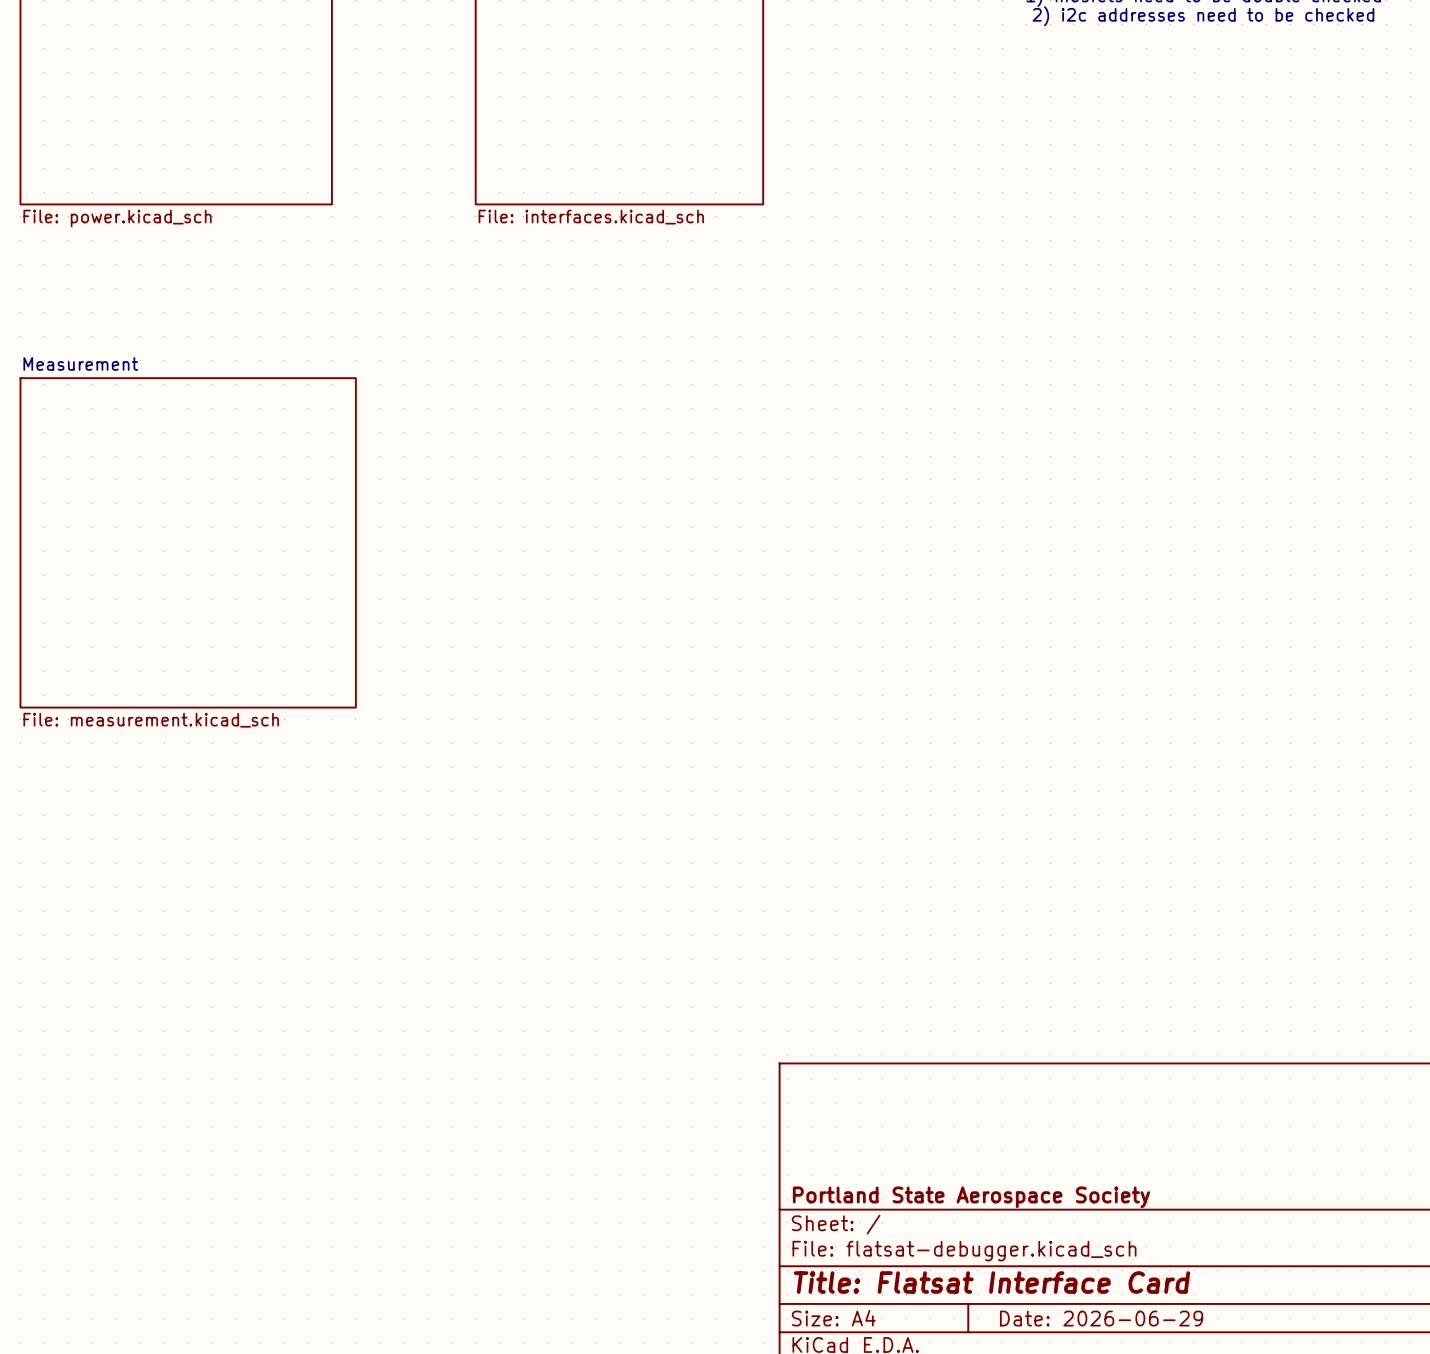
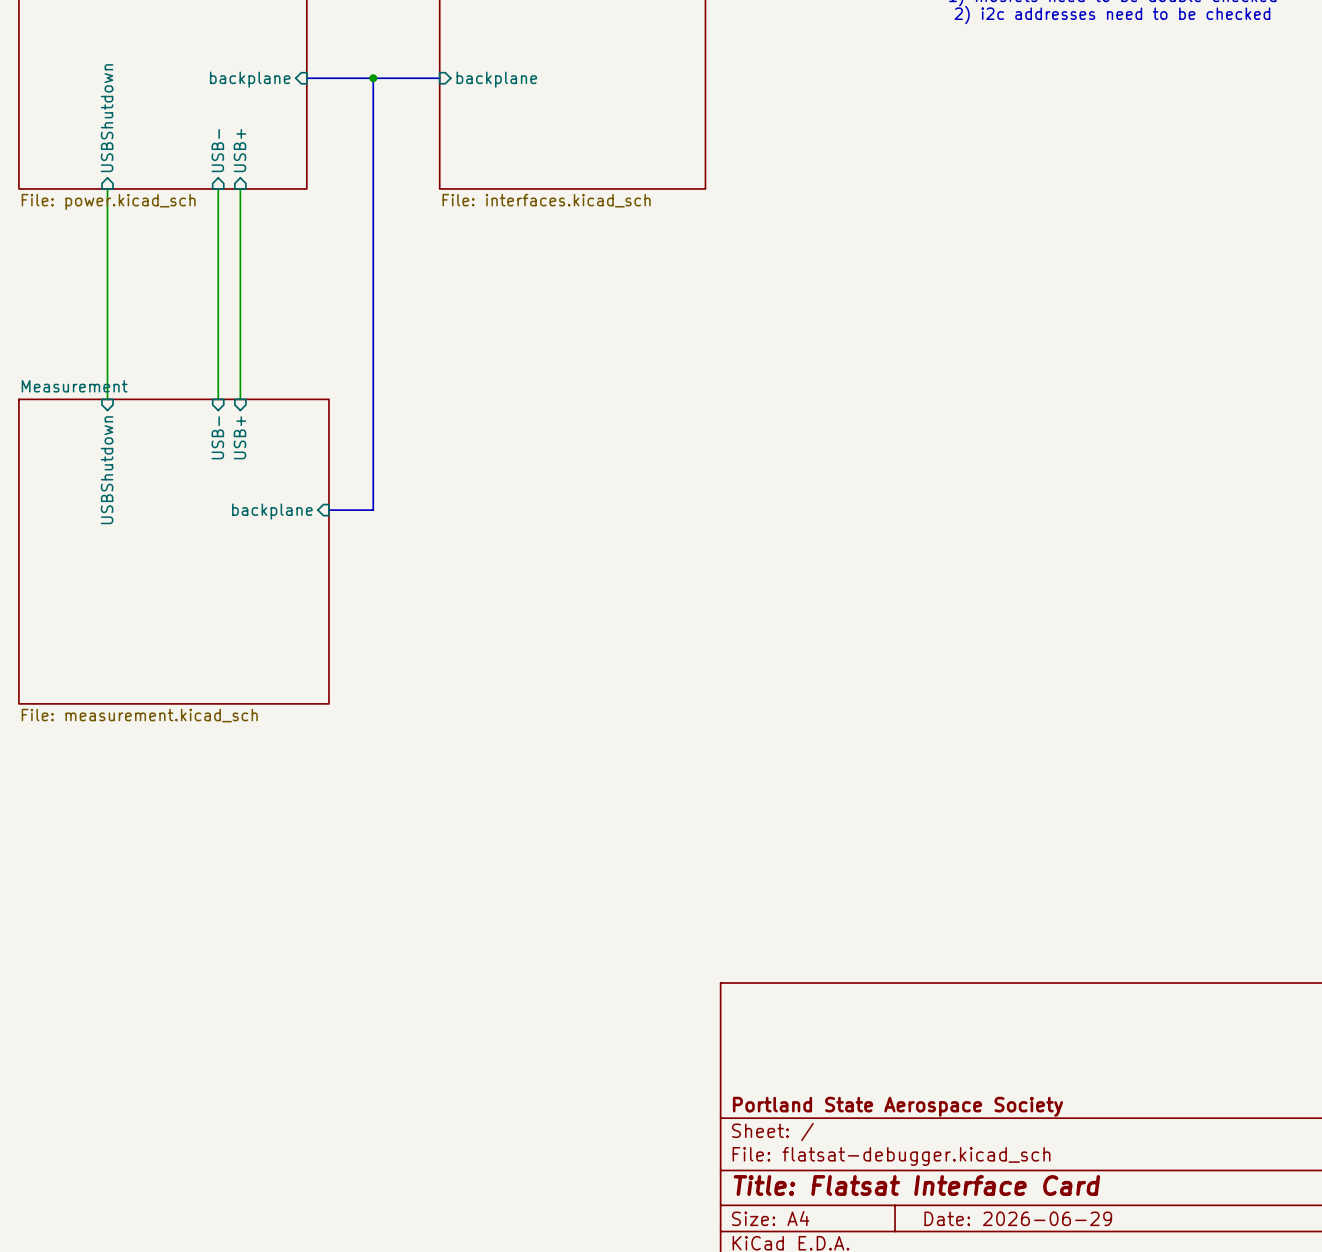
bus: none -> (306, 78) (439, 78)
bus: none -> (373, 78) (373, 510) (328, 510)
junction: none -> (373, 78)
sheet pin: none -> backplane (250, 79)
sheet pin: none -> backplane (496, 79)
sheet pin: none -> USBShutdown (107, 118)
sheet pin: none -> USB- (217, 150)
sheet pin: none -> USB+ (239, 150)
wire: none -> (107, 188) (107, 399)
wire: none -> (218, 188) (218, 399)
wire: none -> (240, 188) (240, 399)
sheet pin: none -> USB- (217, 437)
sheet pin: none -> USB+ (239, 437)
sheet pin: none -> USBShutdown (107, 470)
sheet Measurement position: (188, 542) -> (173, 551)
sheet pin: none -> backplane (272, 511)

